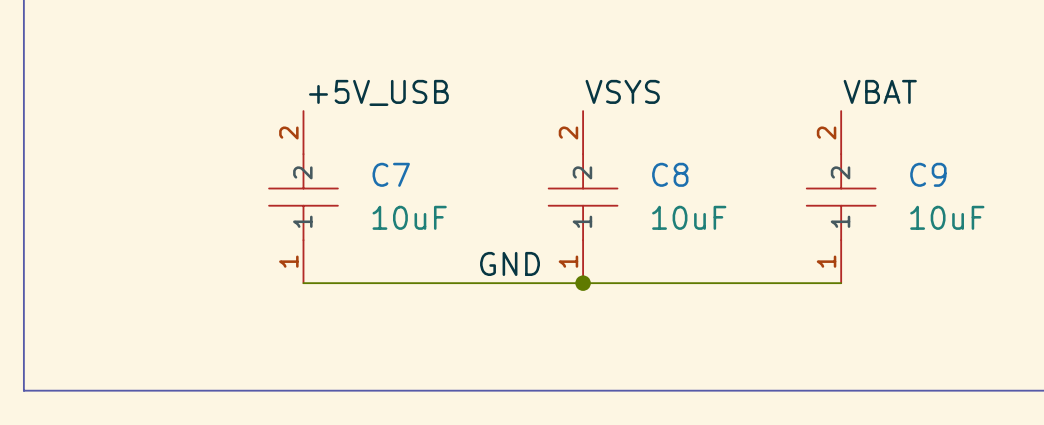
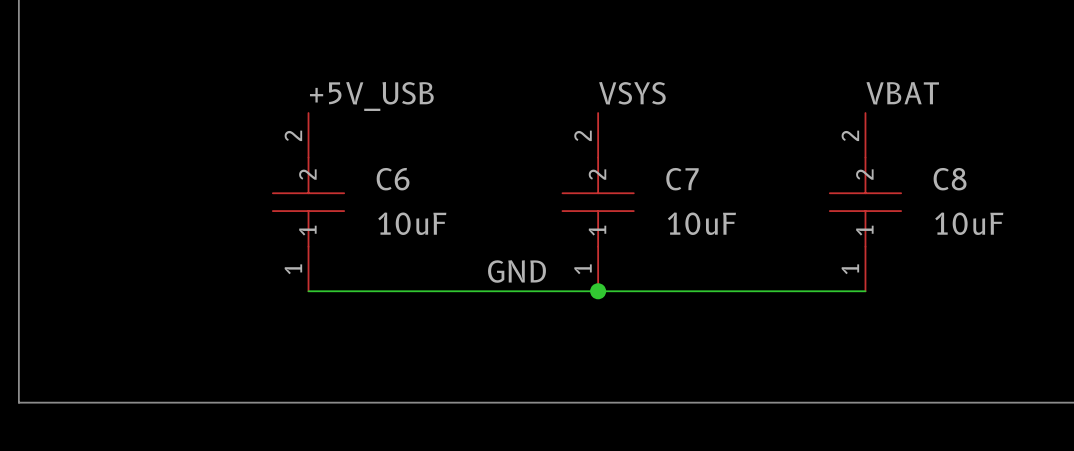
C7 name: C7 (391, 174) -> C6 (393, 179)
C8 name: C8 (670, 174) -> C7 (682, 179)
C9 name: C9 (928, 174) -> C8 (950, 179)

